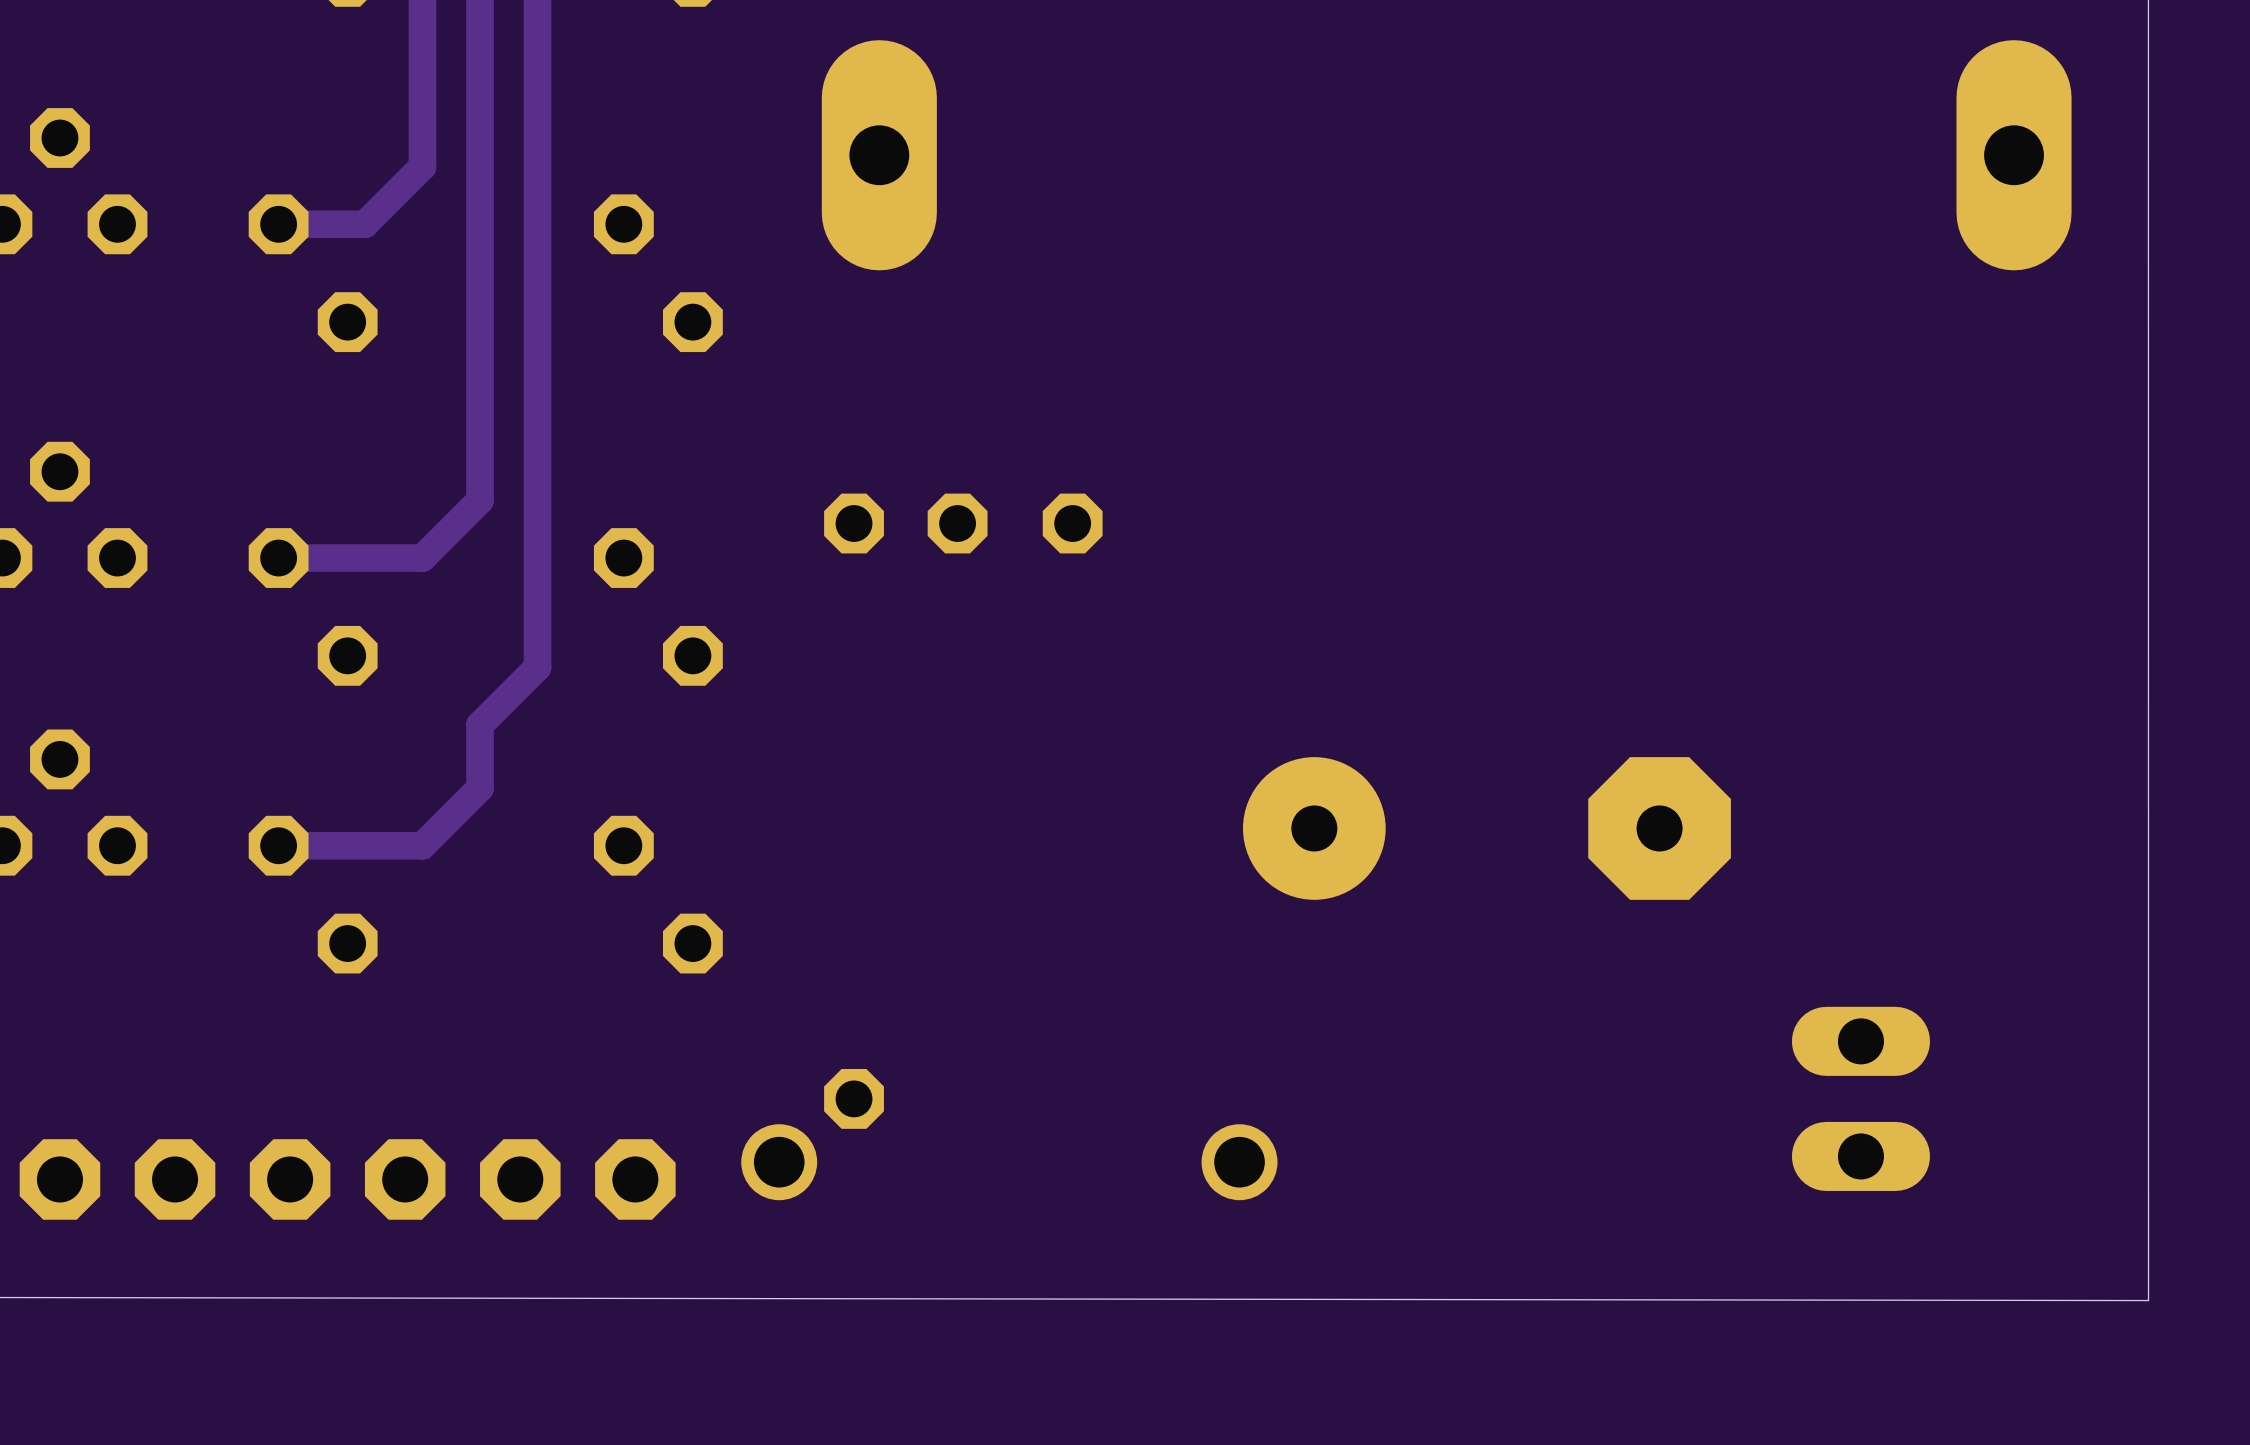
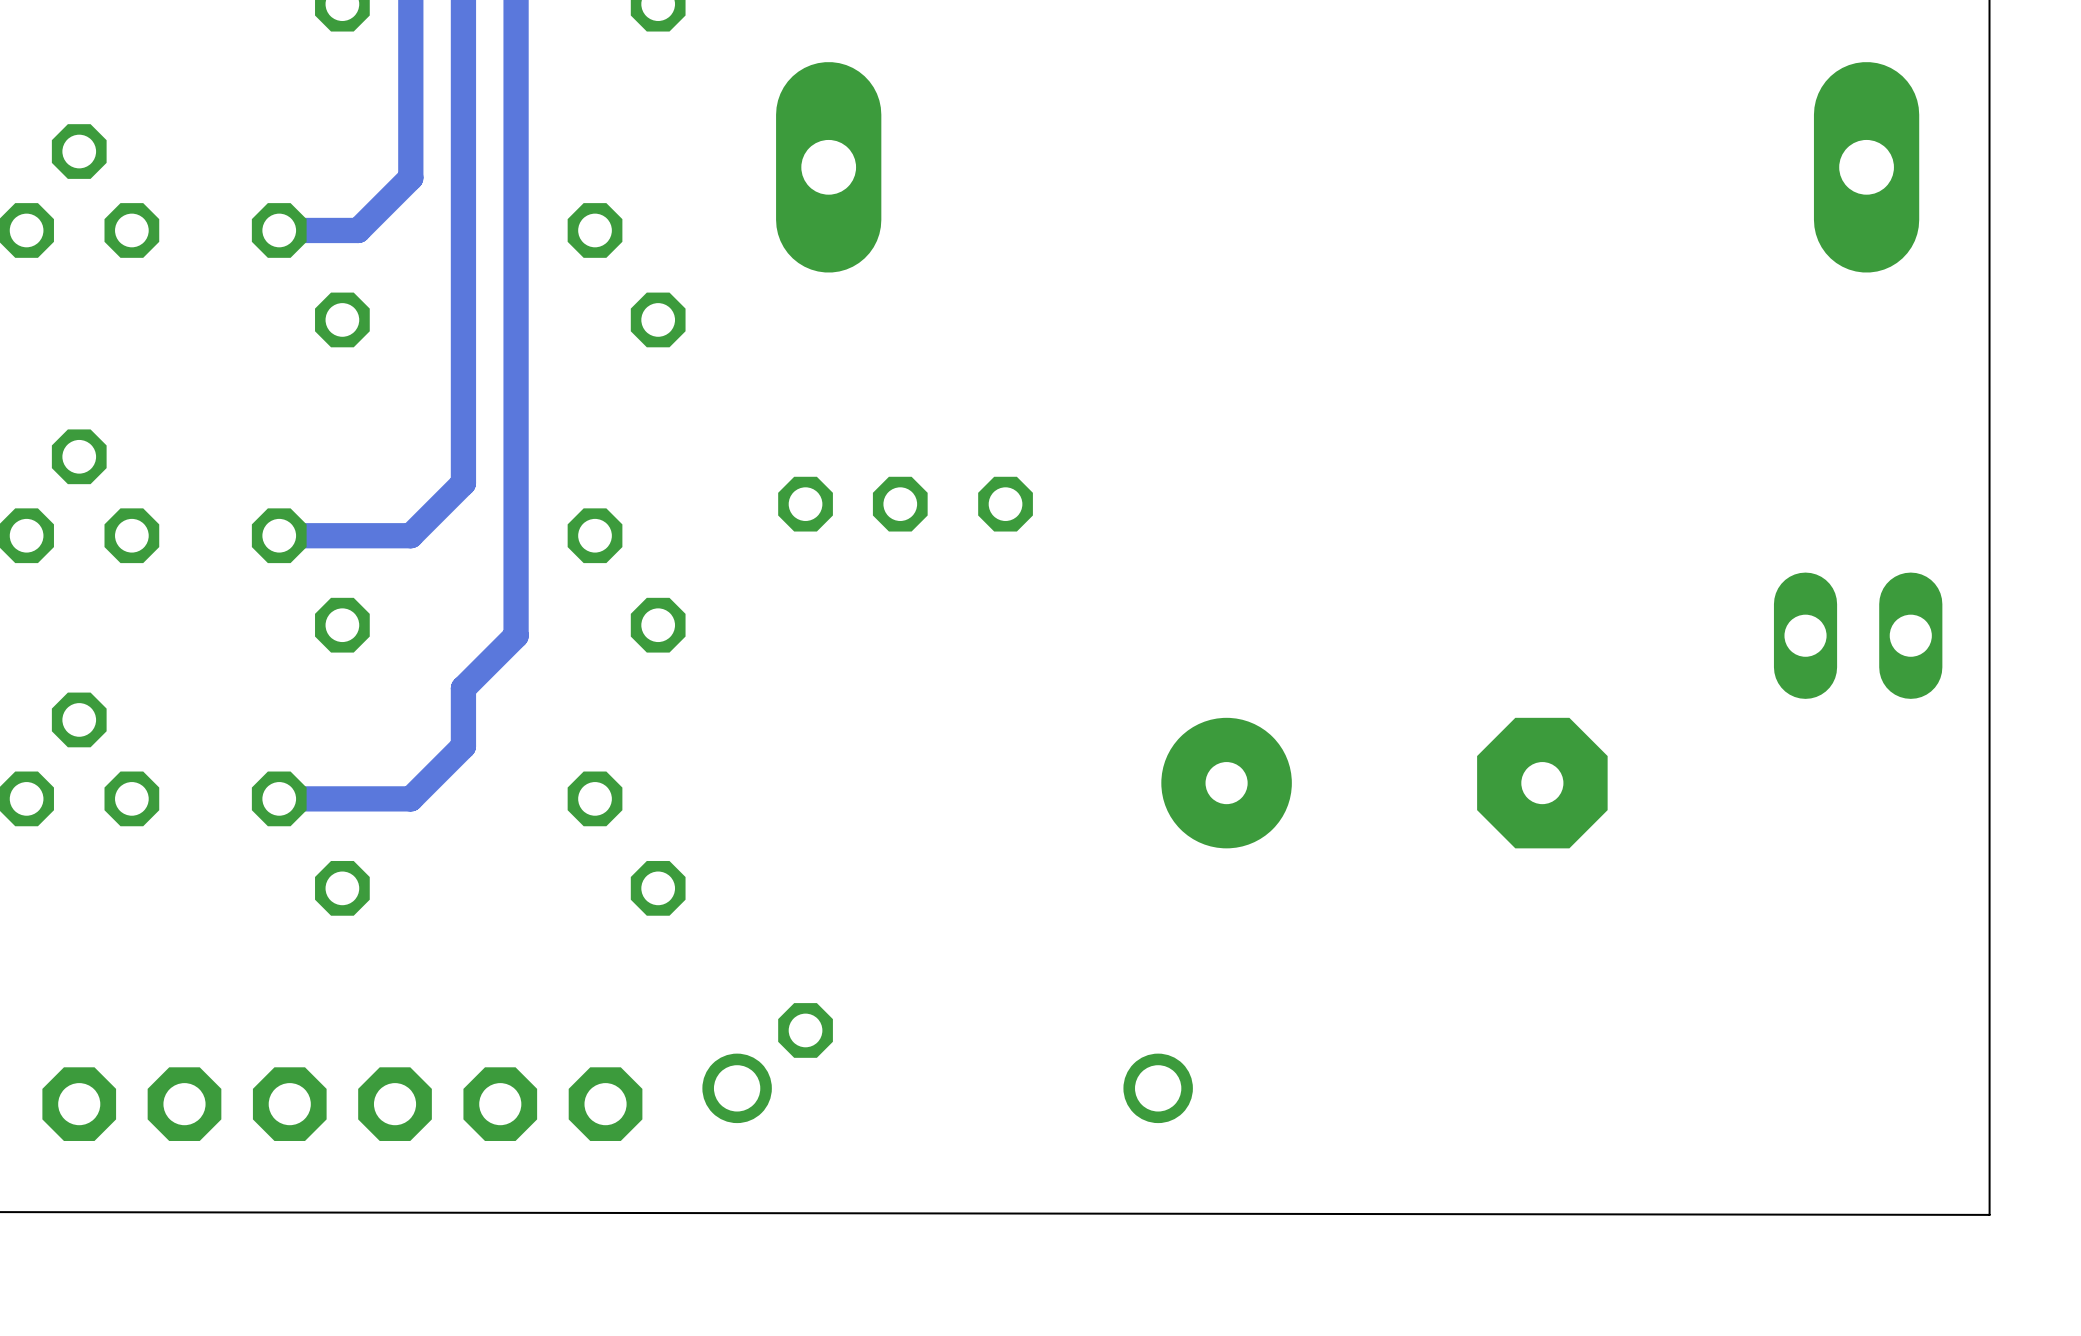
part rotation: 0° (1860, 1098) -> 90° clockwise (1858, 635)
part position: (1860, 1098) -> (1858, 635)

